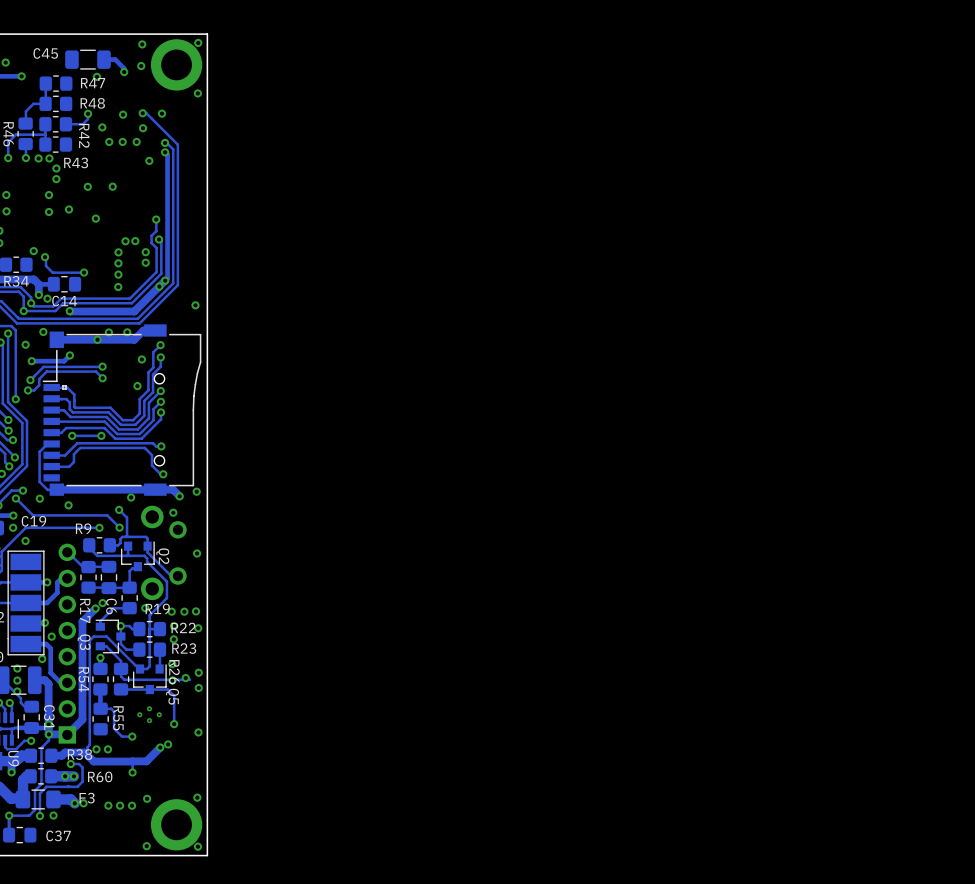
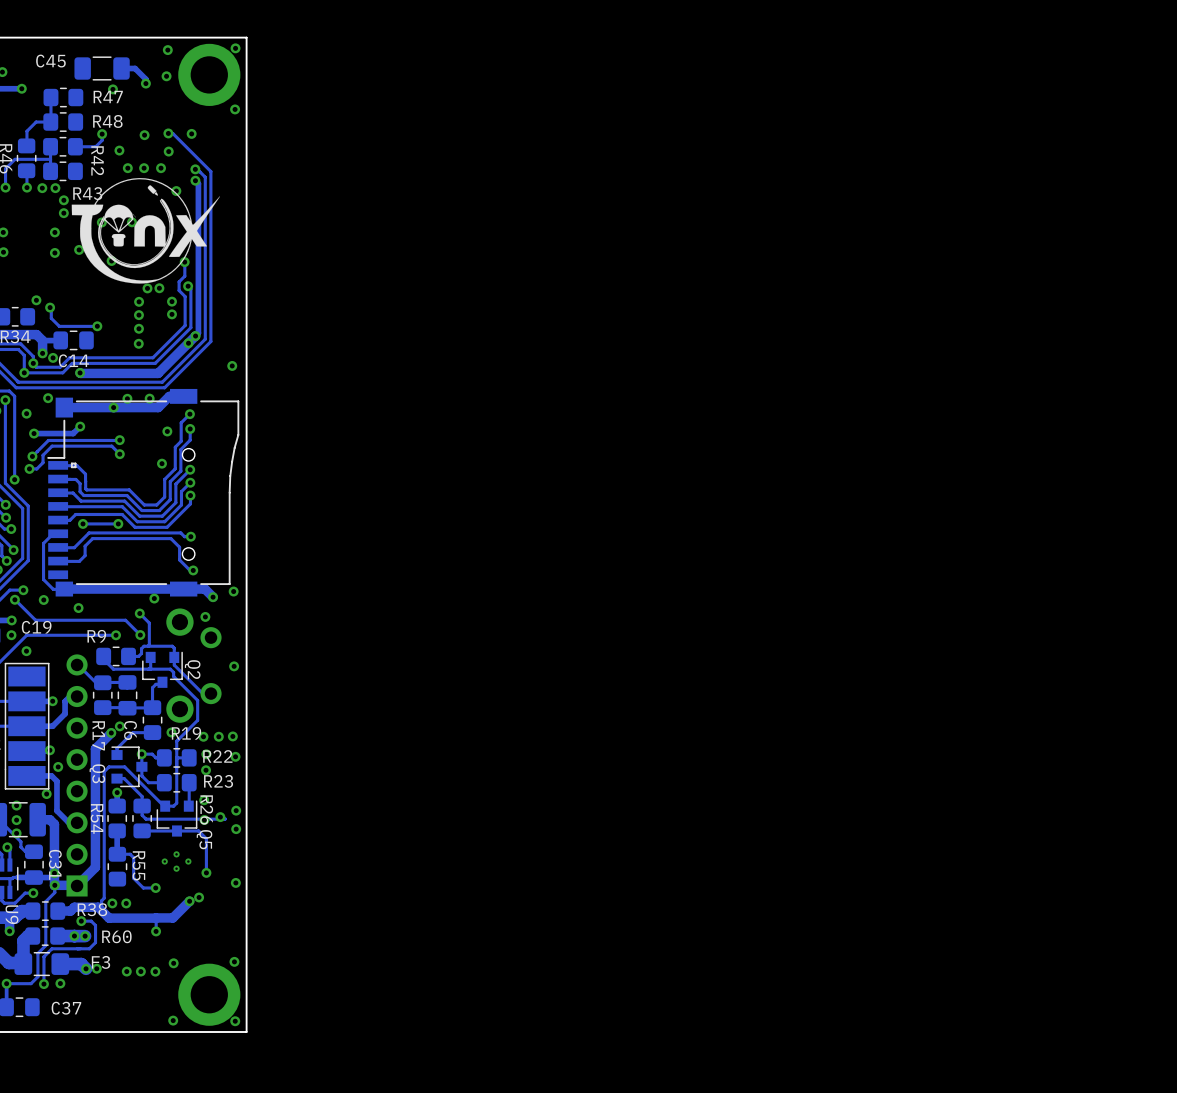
drawing: none -> [71, 178, 220, 284]

